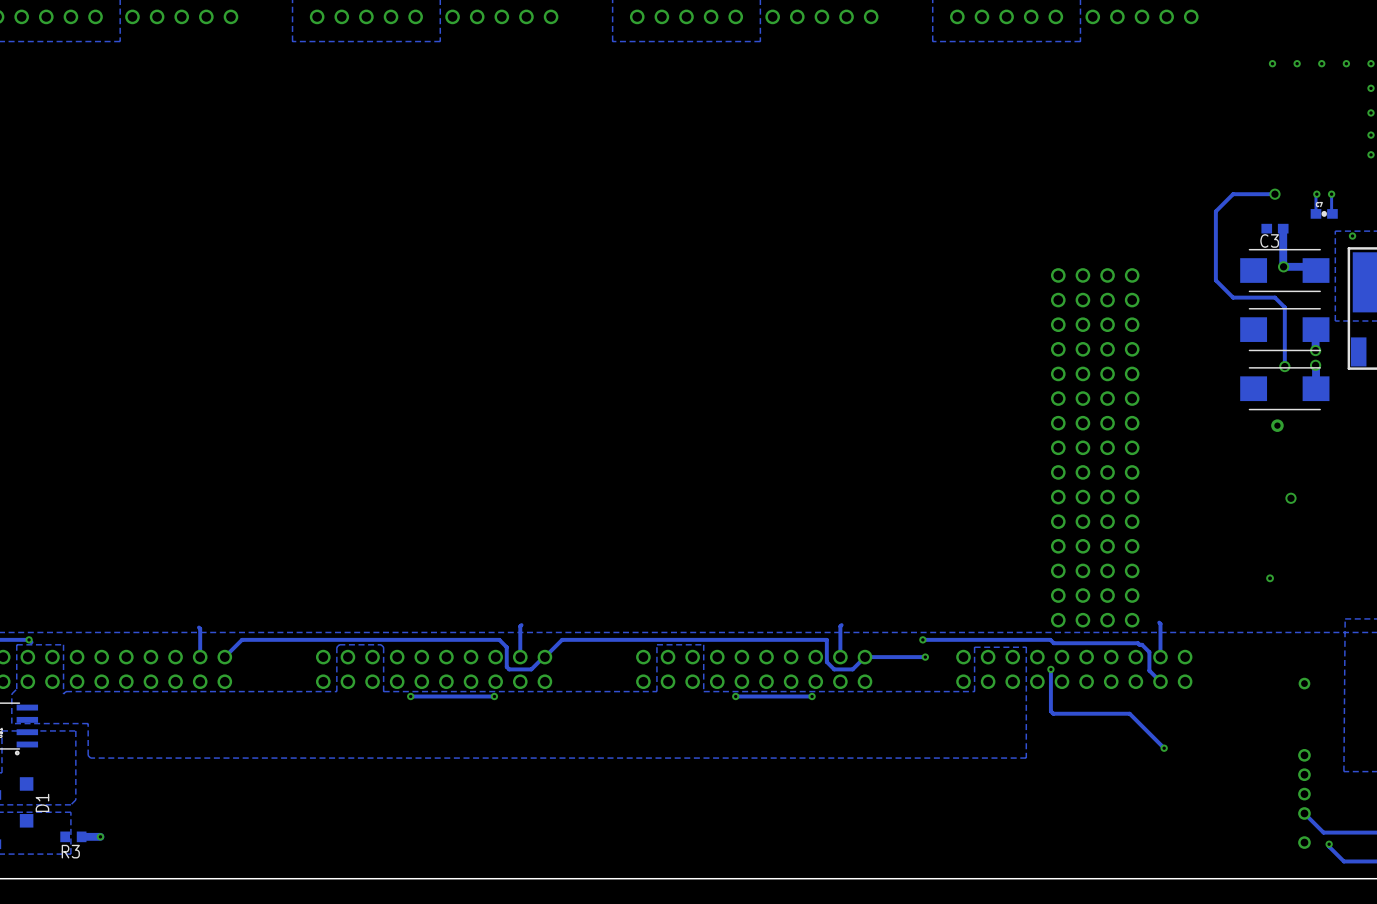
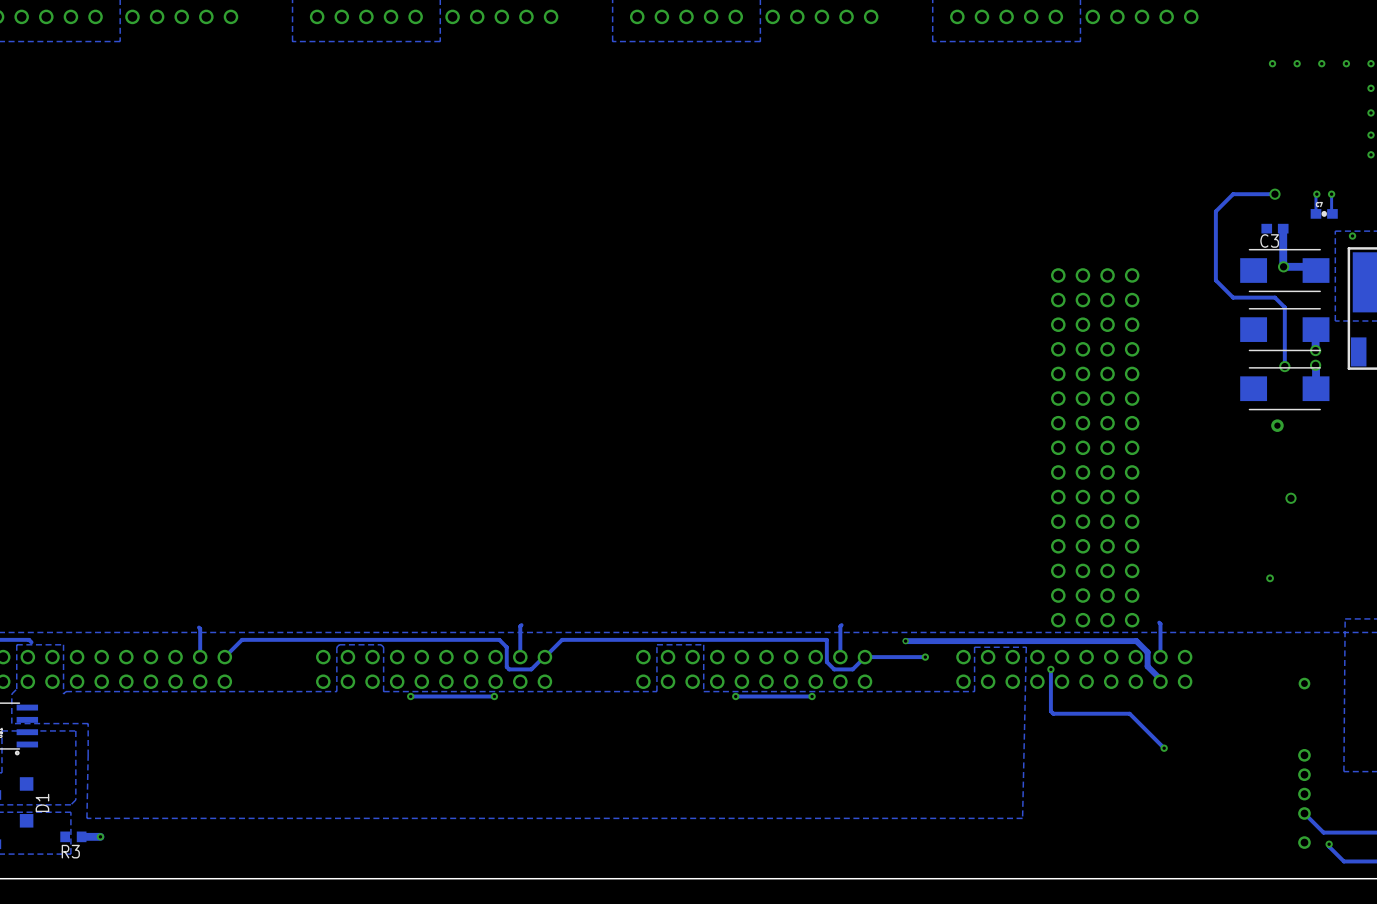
via: (29, 639) -> none
track: (922, 639) (1050, 639) (1053, 643) (1138, 643) (1149, 652) (1149, 670) (1160, 681) -> (905, 641) (1136, 641) (1147, 652) (1147, 666) (1160, 679) (1160, 681)
via: (922, 639) -> none
via: none -> (905, 641)
zone outline: (1026, 647) (1026, 758) (90, 758) (88, 755) -> (1026, 647) (1022, 818) (86, 818) (88, 755)

